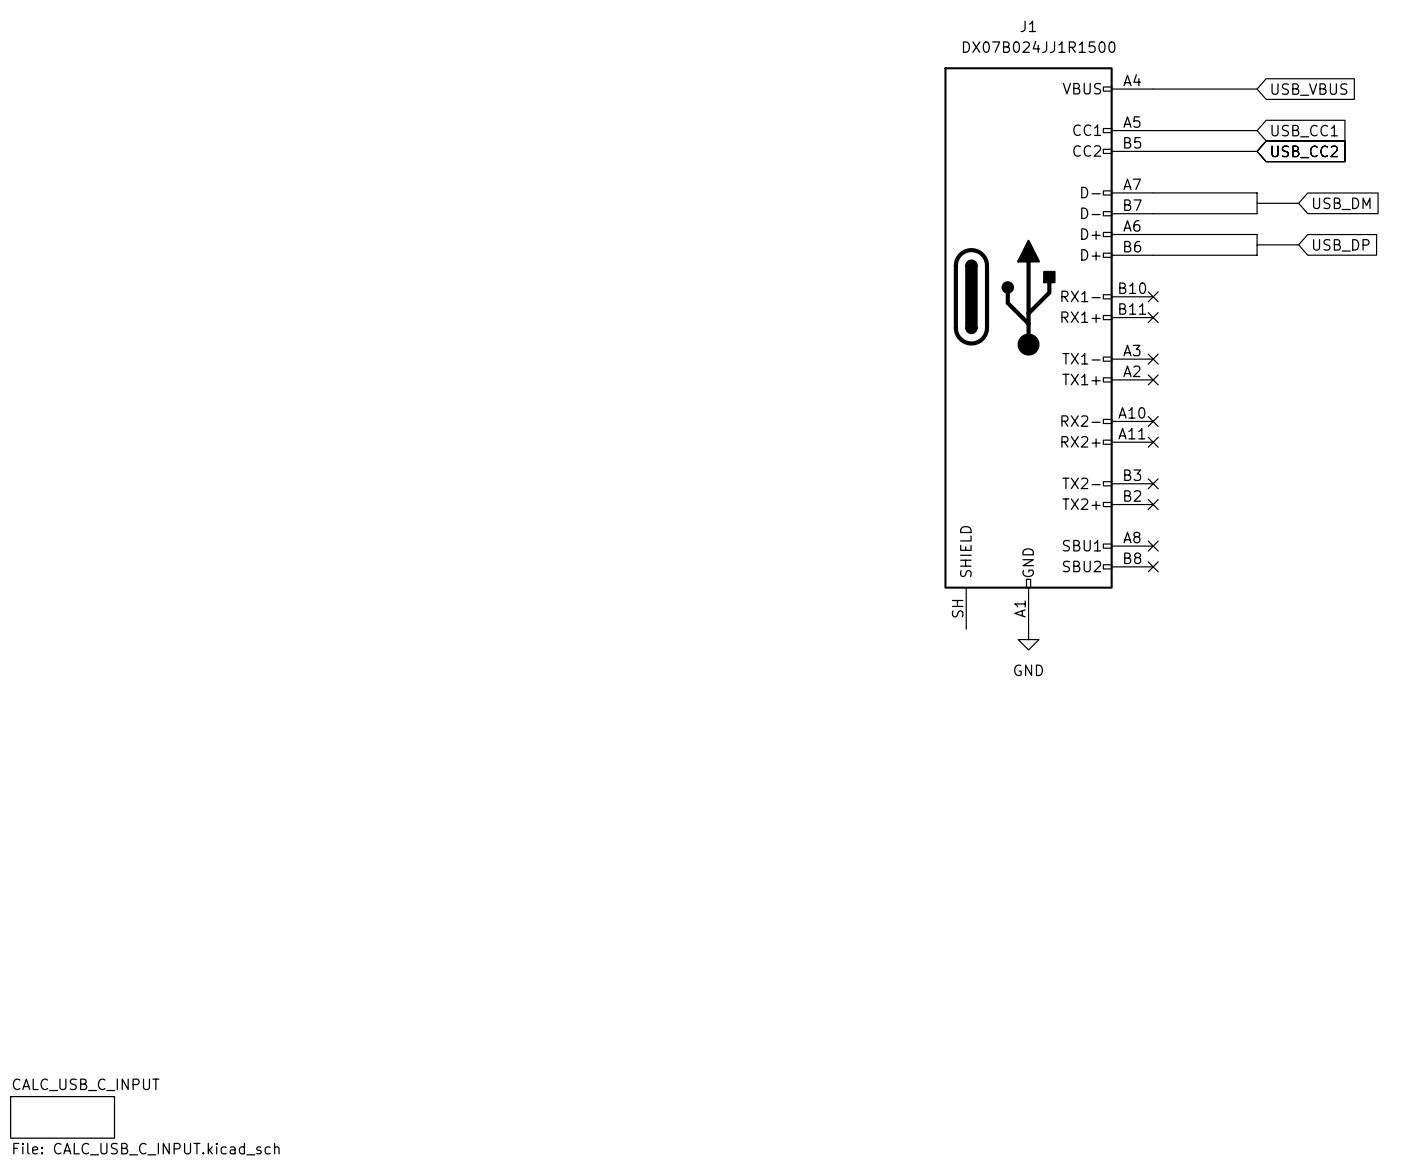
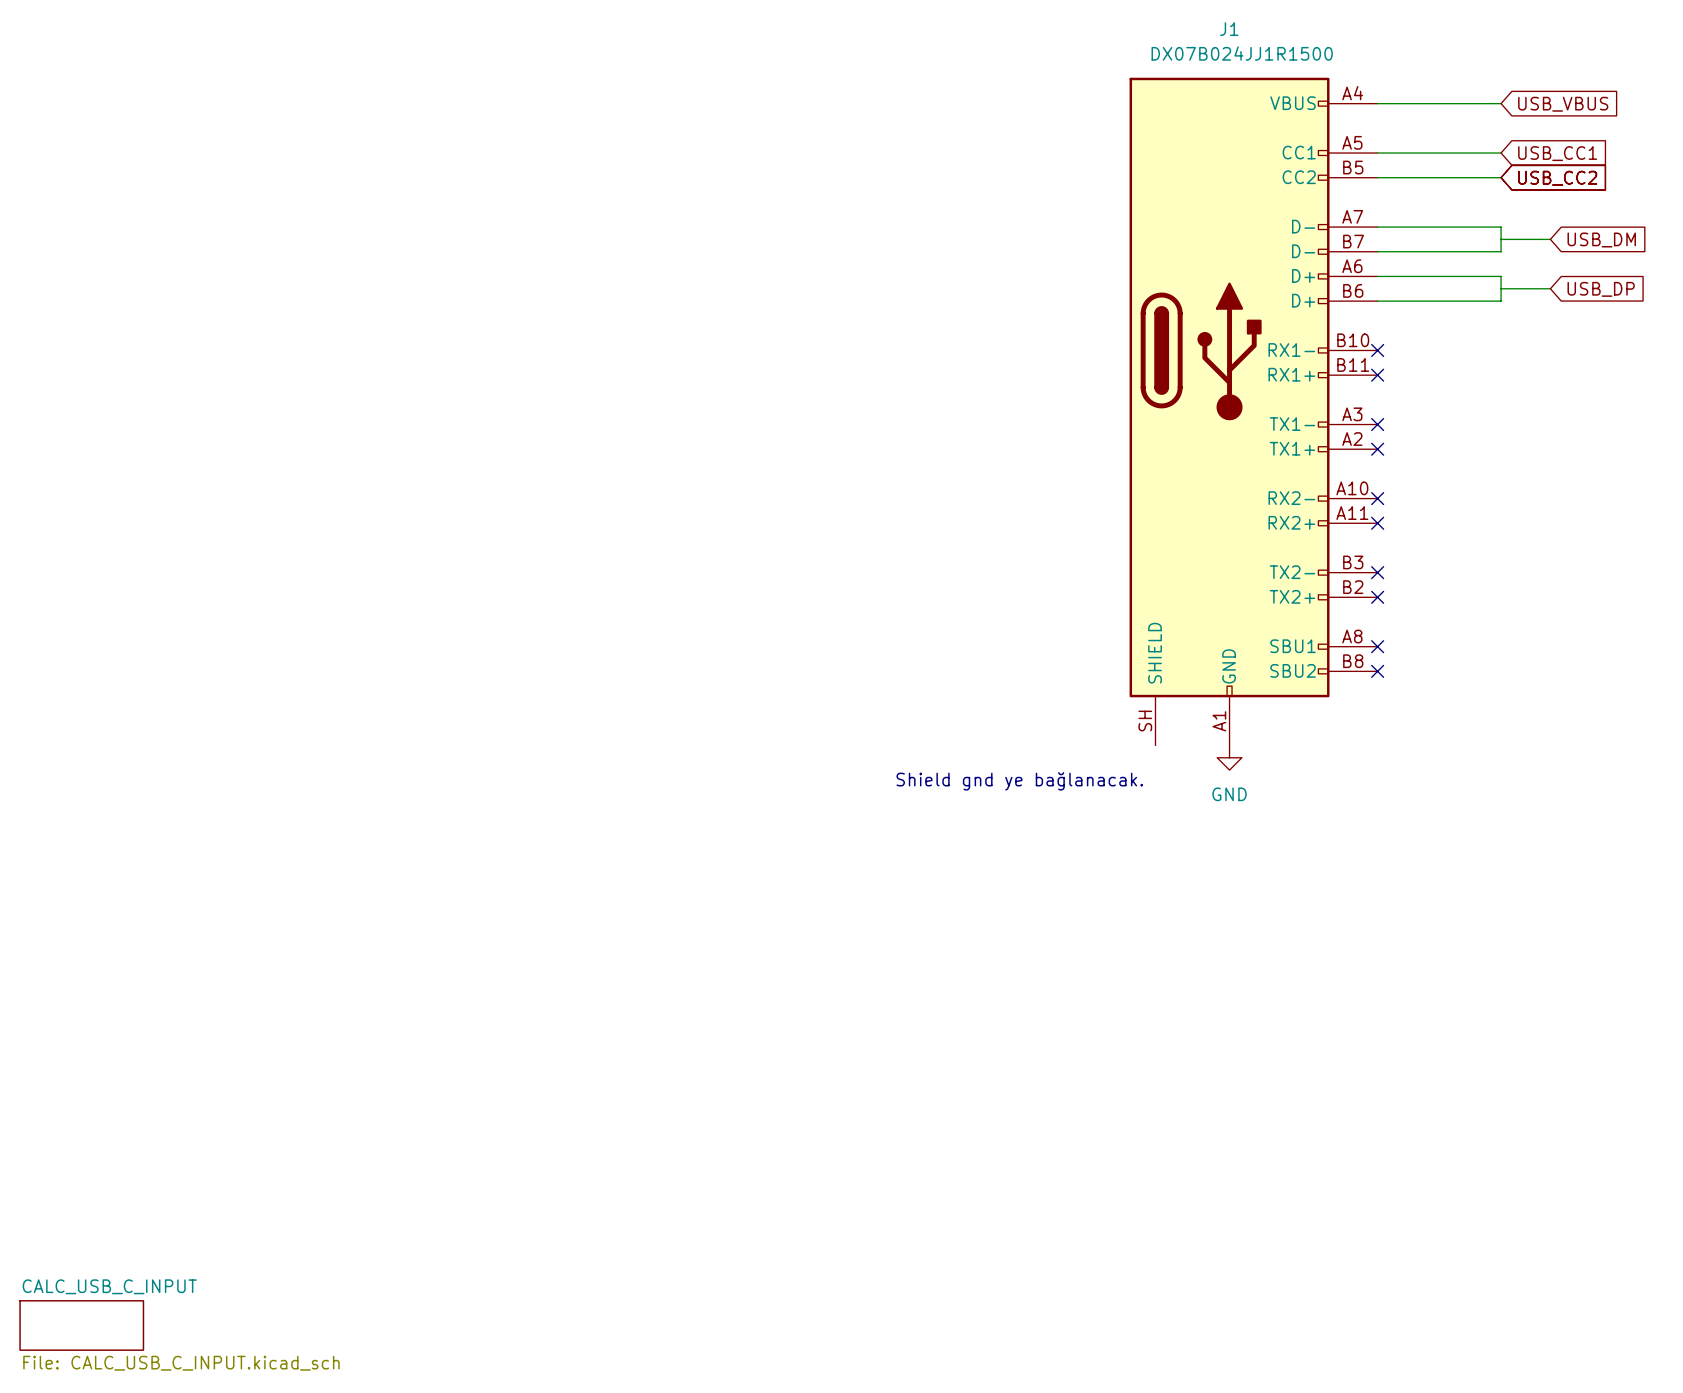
text: none -> Shield gnd ye bağlanacak. (1019, 781)

